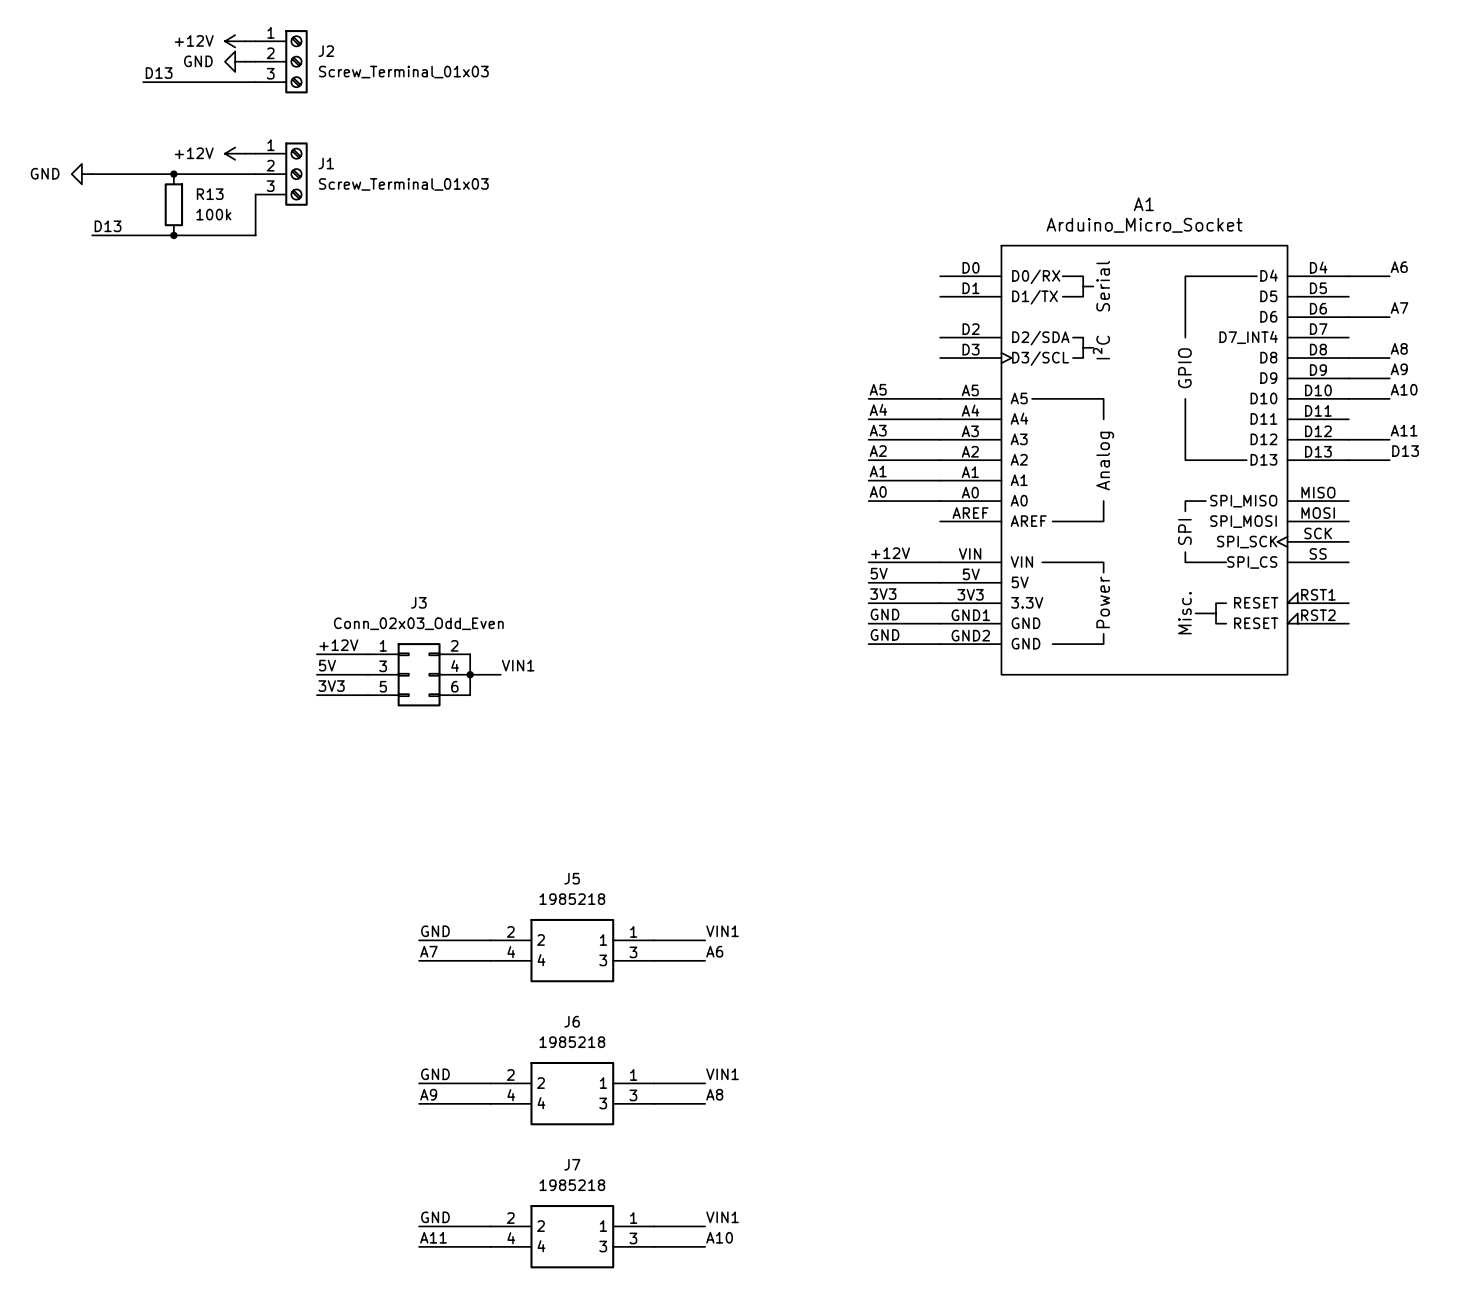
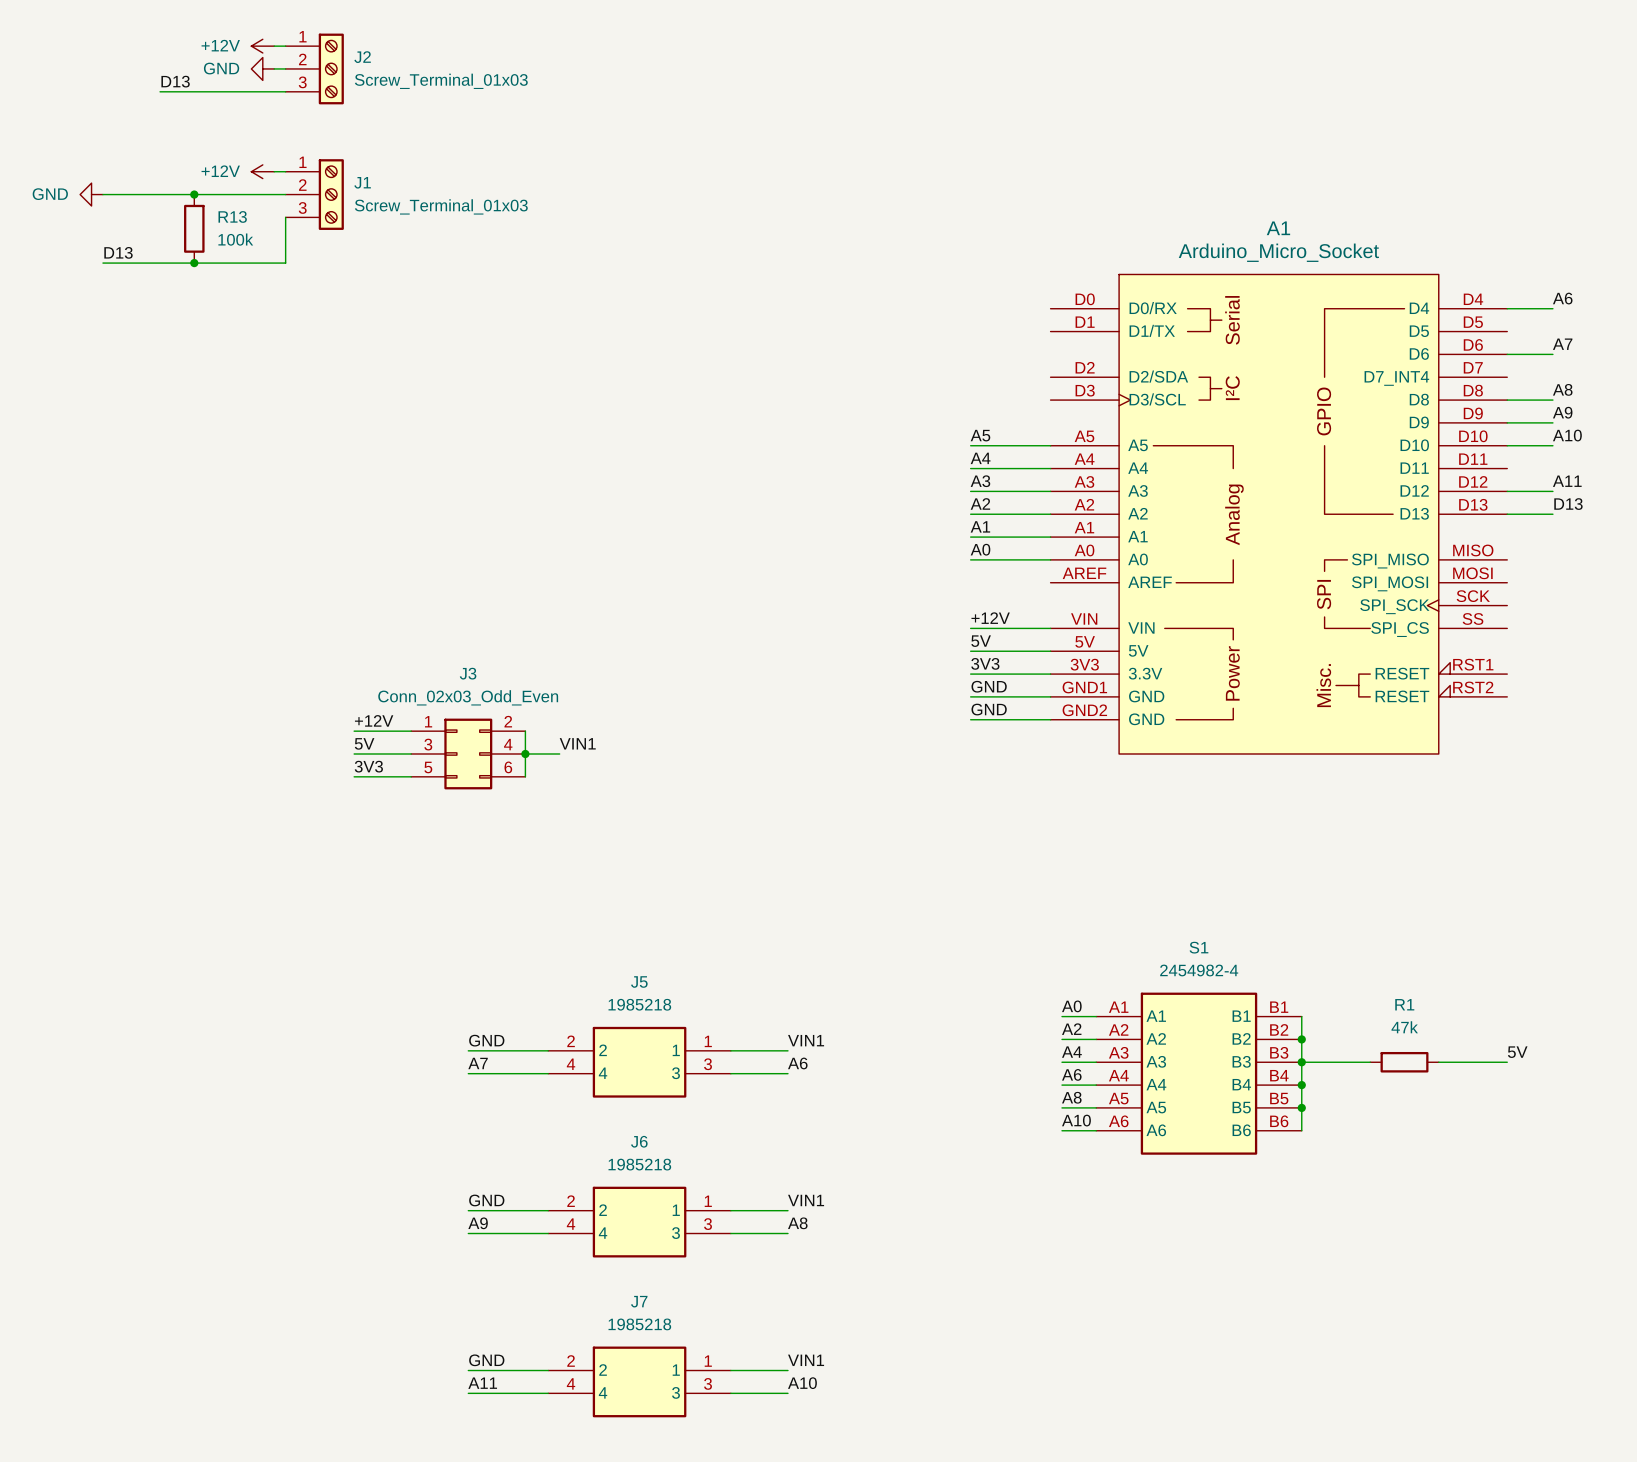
label: none -> A0 (1071, 1006)
wire: none -> (1062, 1016) (1096, 1016)
wire: none -> (1301, 1016) (1301, 1130)
label: none -> A2 (1071, 1029)
wire: none -> (1062, 1039) (1096, 1039)
junction: none -> (1301, 1039)
label: none -> A4 (1071, 1052)
label: none -> 5V (1517, 1052)
wire: none -> (1062, 1062) (1096, 1062)
wire: none -> (1301, 1062) (1370, 1062)
junction: none -> (1301, 1062)
R1: none -> 47k (1404, 1062)
wire: none -> (1438, 1062) (1507, 1062)
S1: none -> 2454982-4 (1199, 1073)
label: none -> A6 (1071, 1074)
wire: none -> (1062, 1085) (1096, 1085)
junction: none -> (1301, 1085)
label: none -> A8 (1071, 1097)
wire: none -> (1062, 1107) (1096, 1107)
junction: none -> (1301, 1107)
label: none -> A10 (1076, 1120)
wire: none -> (1062, 1130) (1096, 1130)

